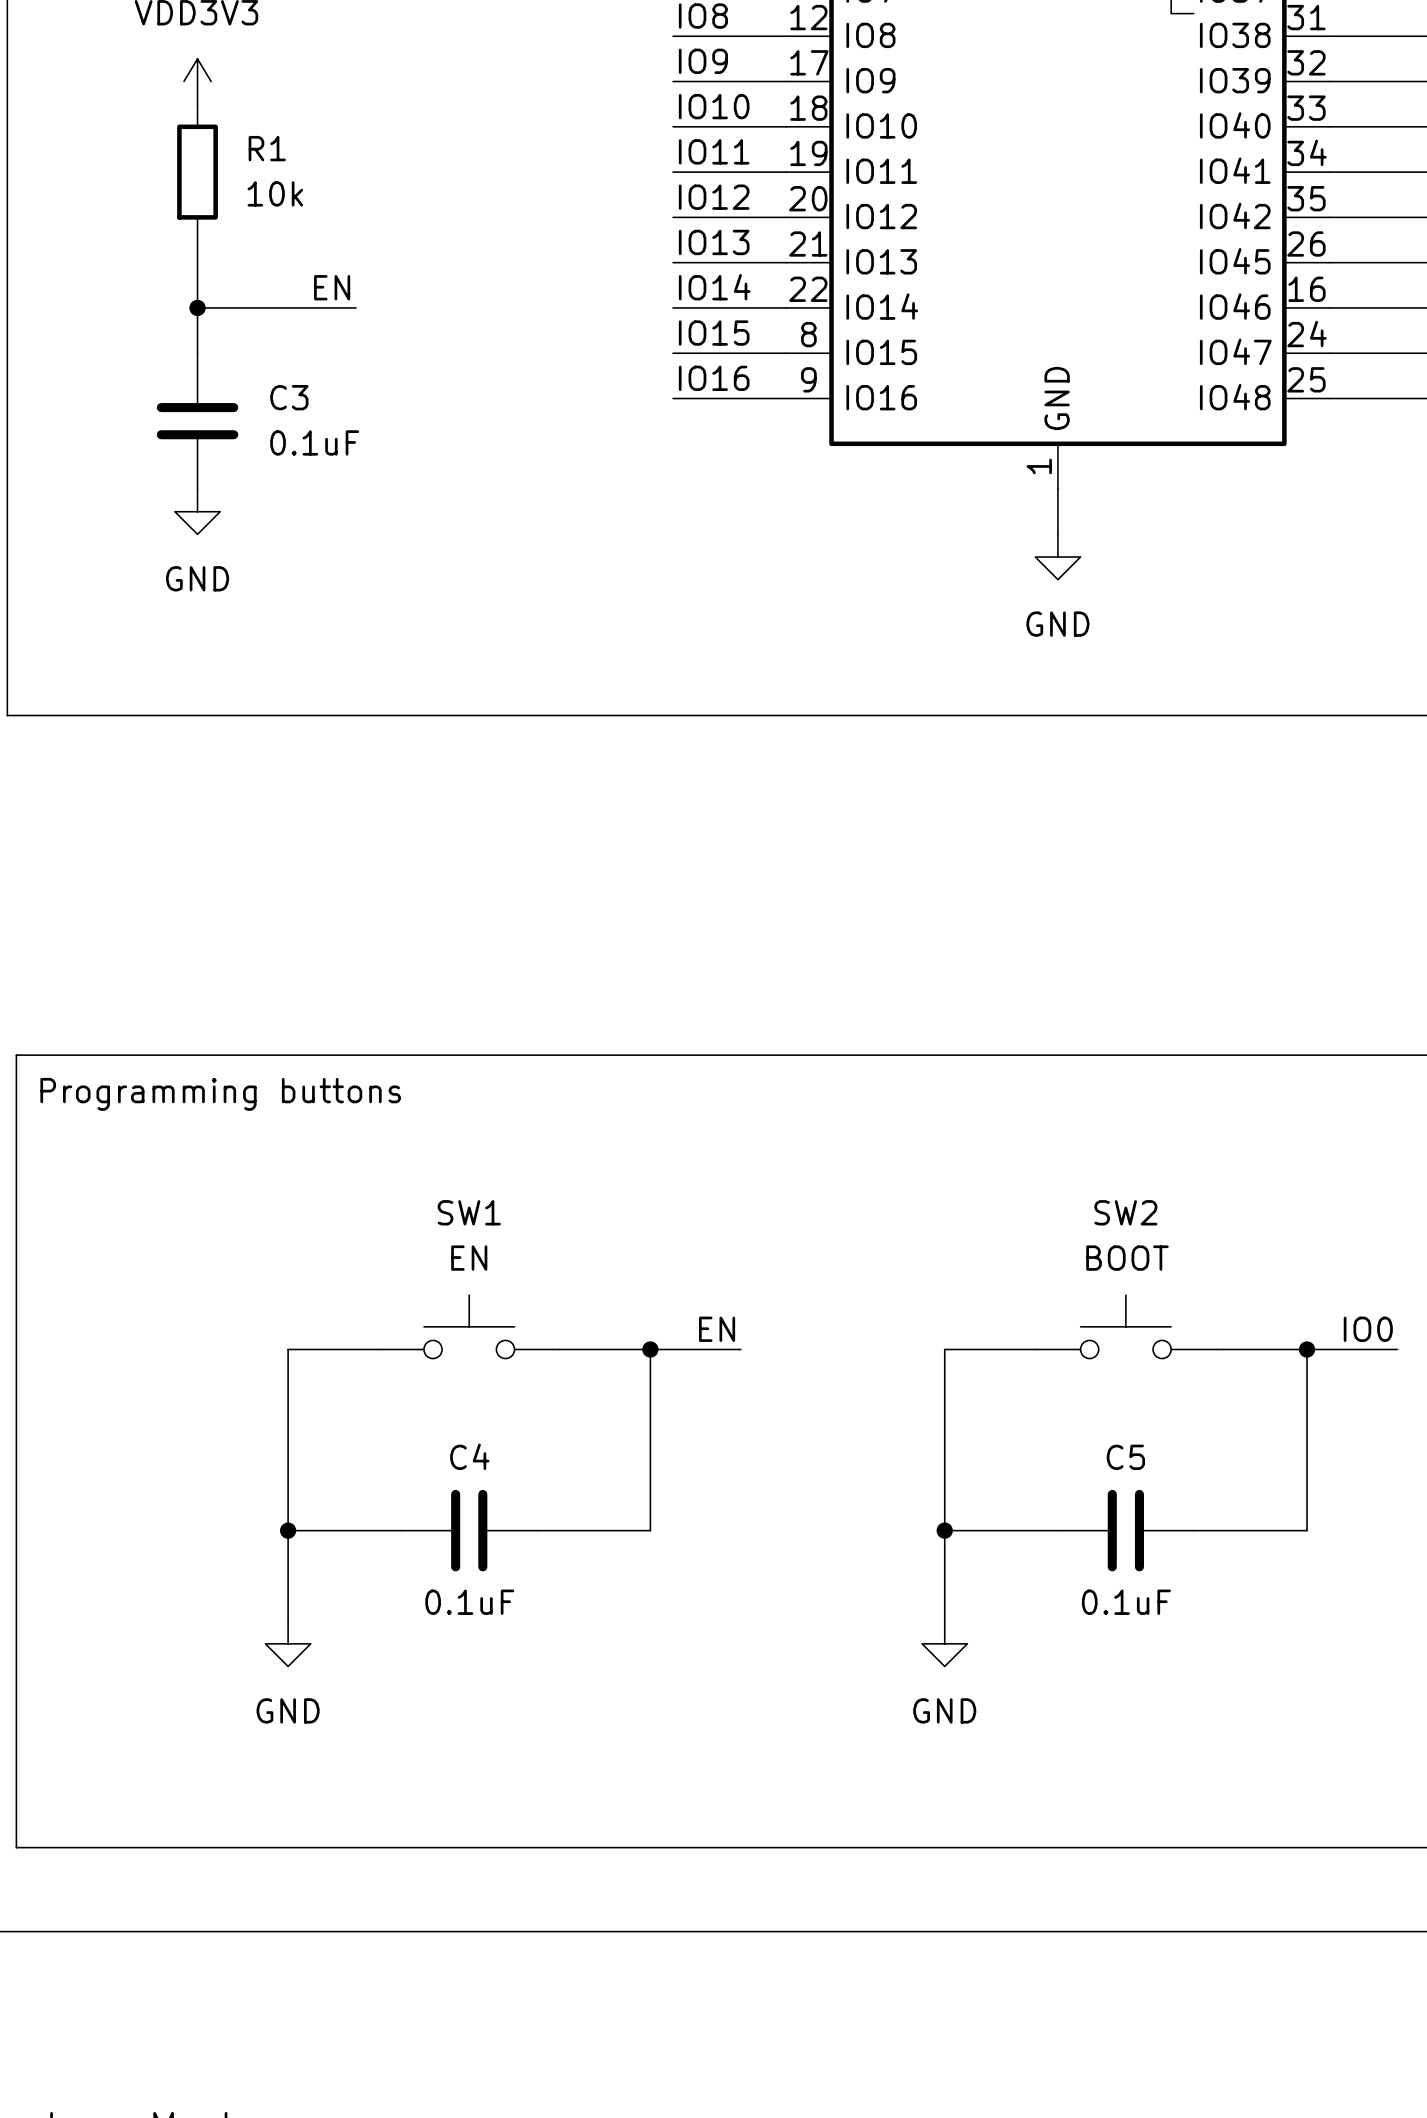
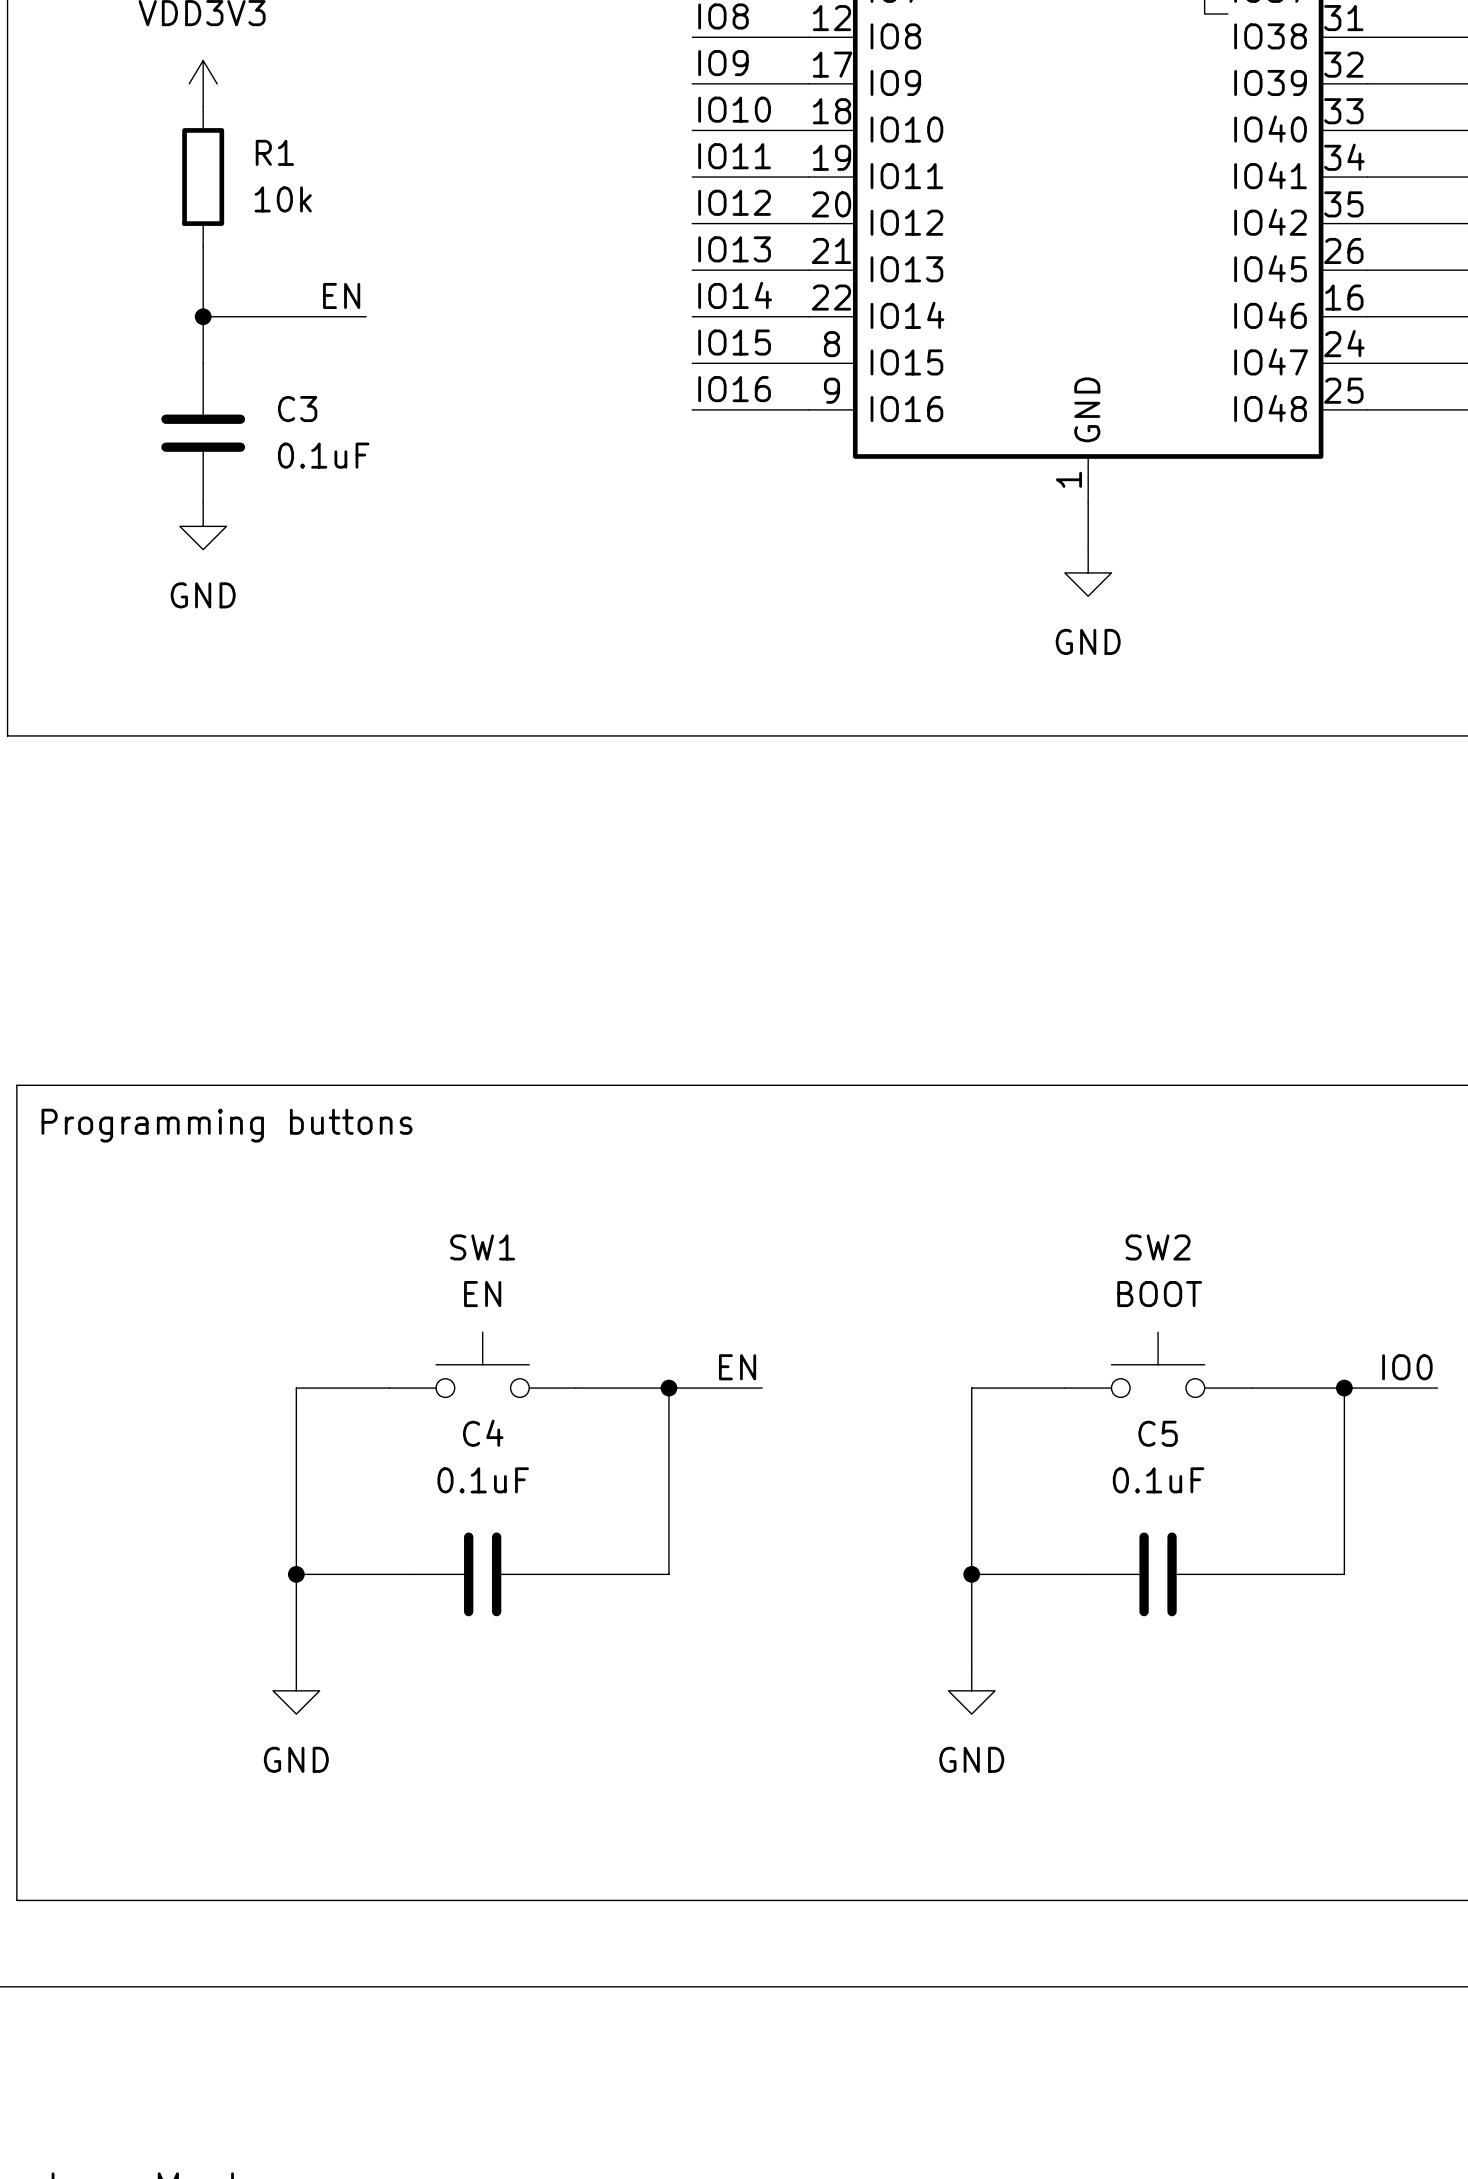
C4 name position: C4 (469, 1456) -> C4 (483, 1433)
C5 name position: C5 (1125, 1457) -> C5 (1158, 1433)
C4 value position: 0.1uF (469, 1602) -> 0.1uF (483, 1480)
C5 value position: 0.1uF (1126, 1602) -> 0.1uF (1158, 1480)

